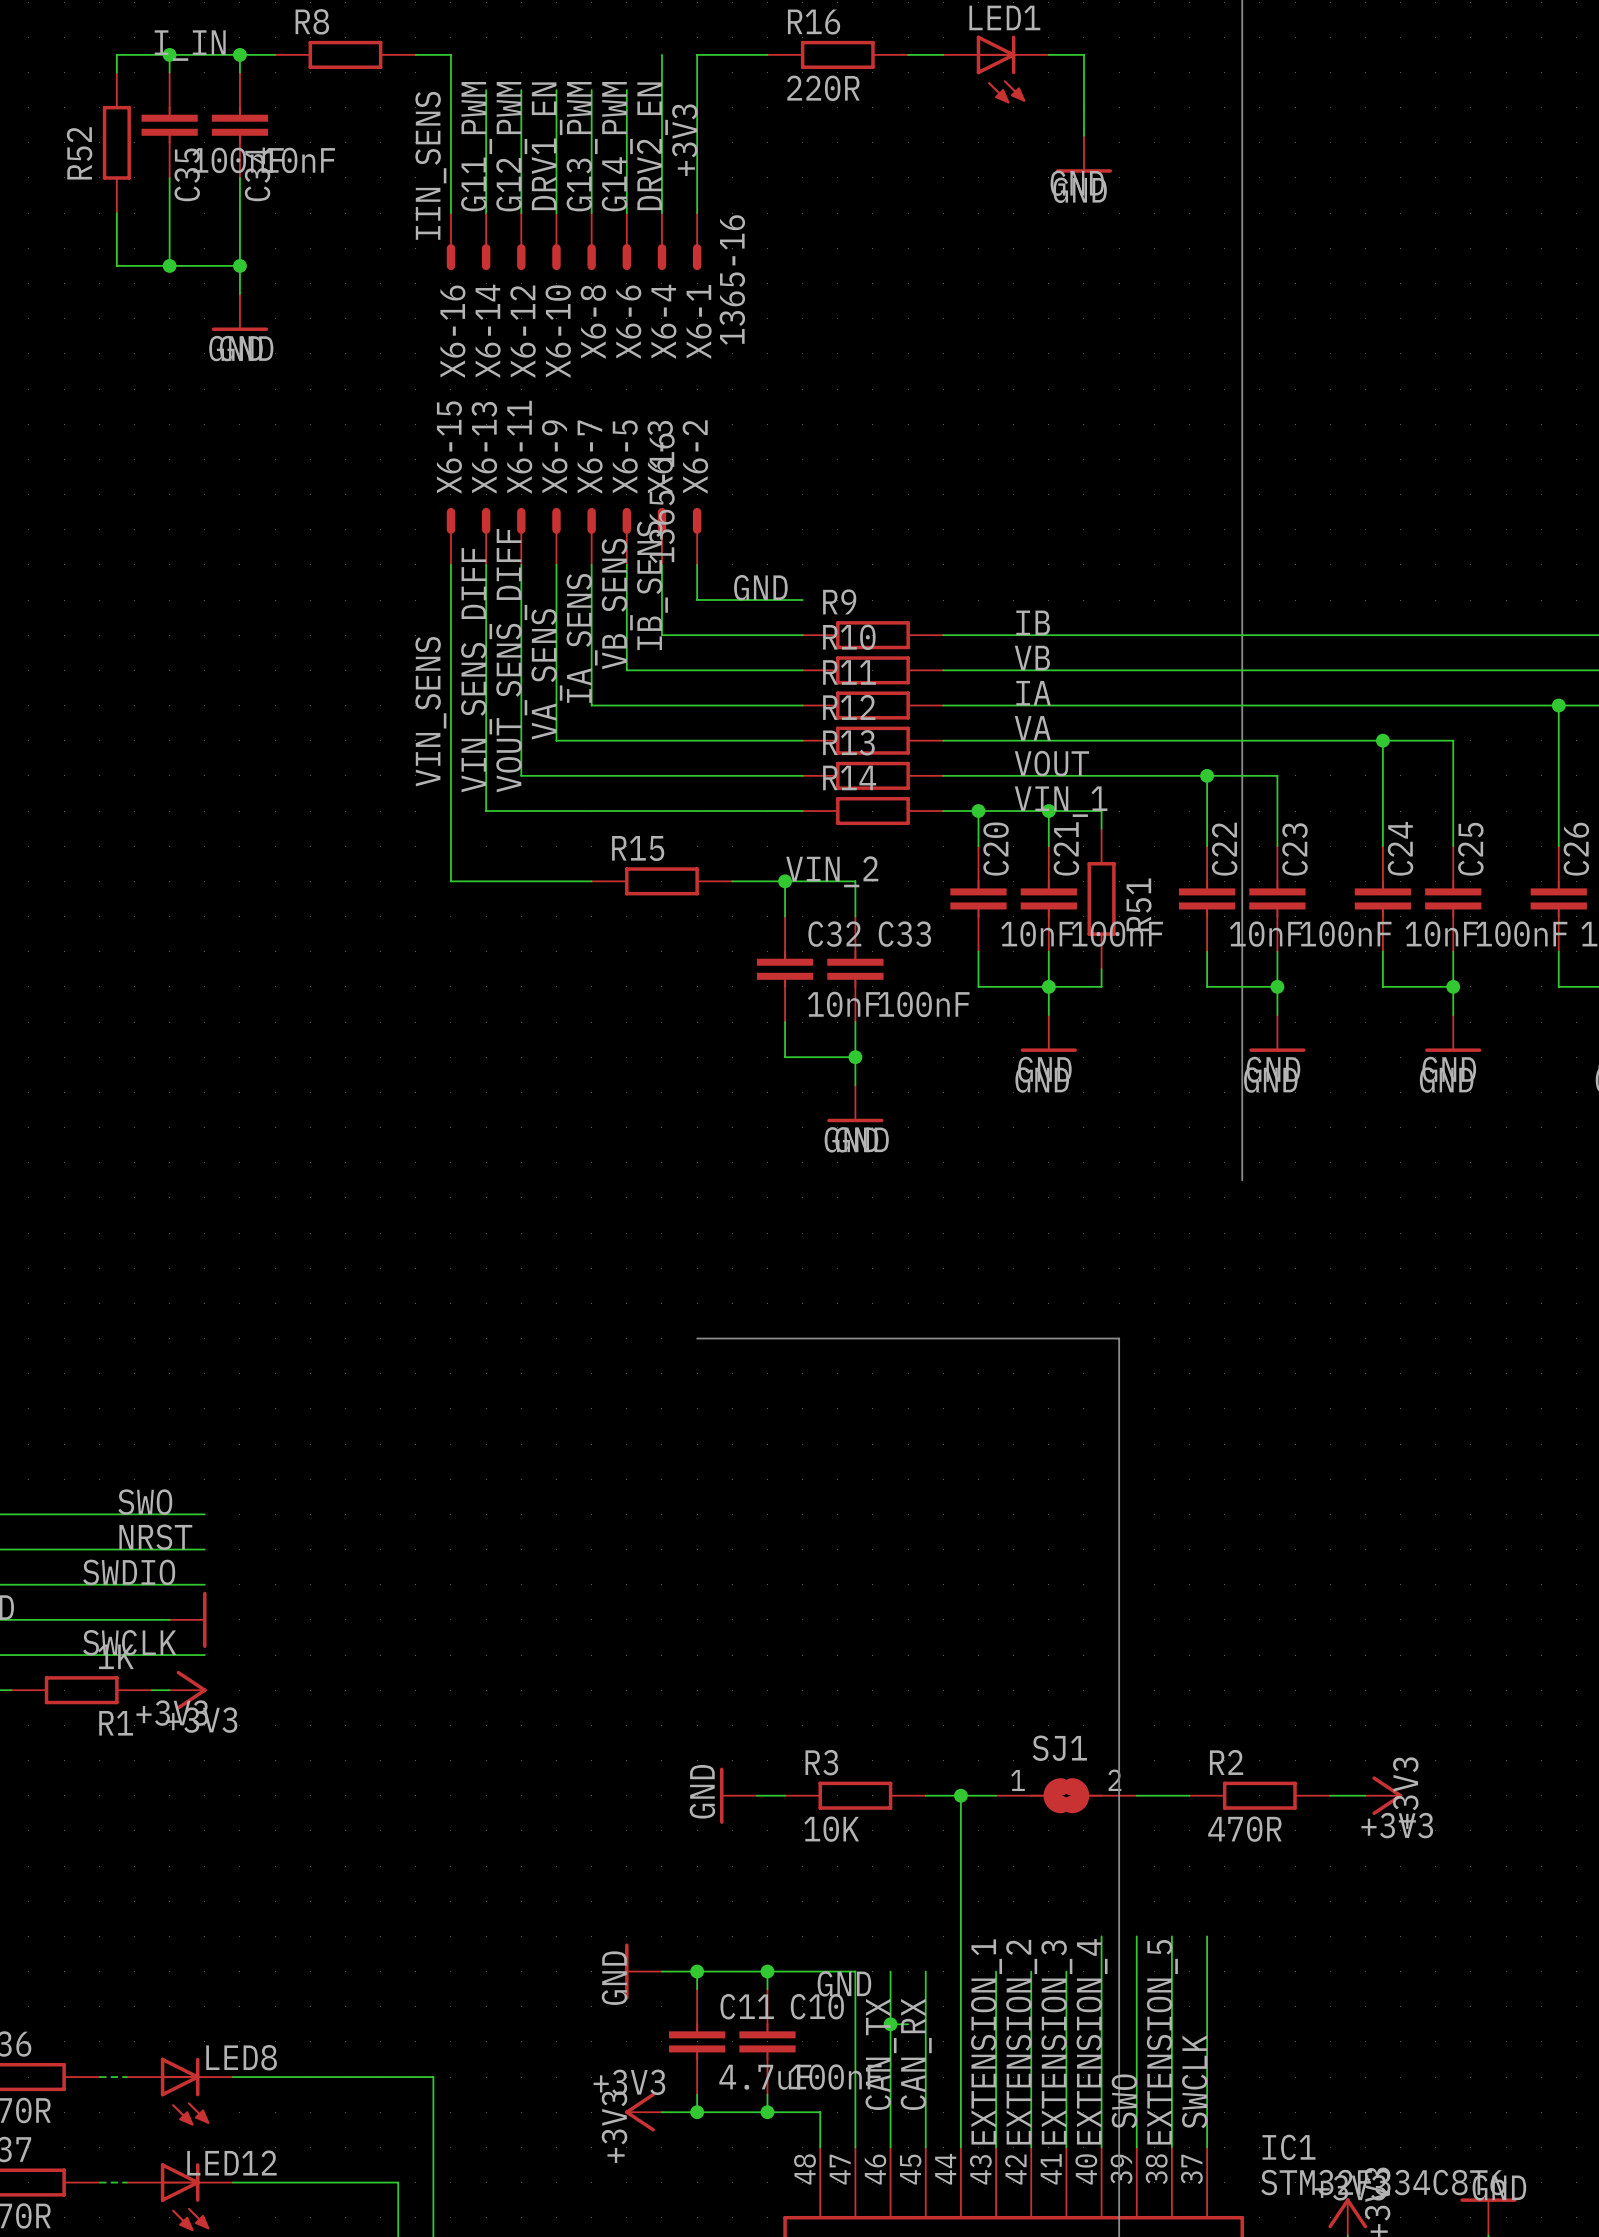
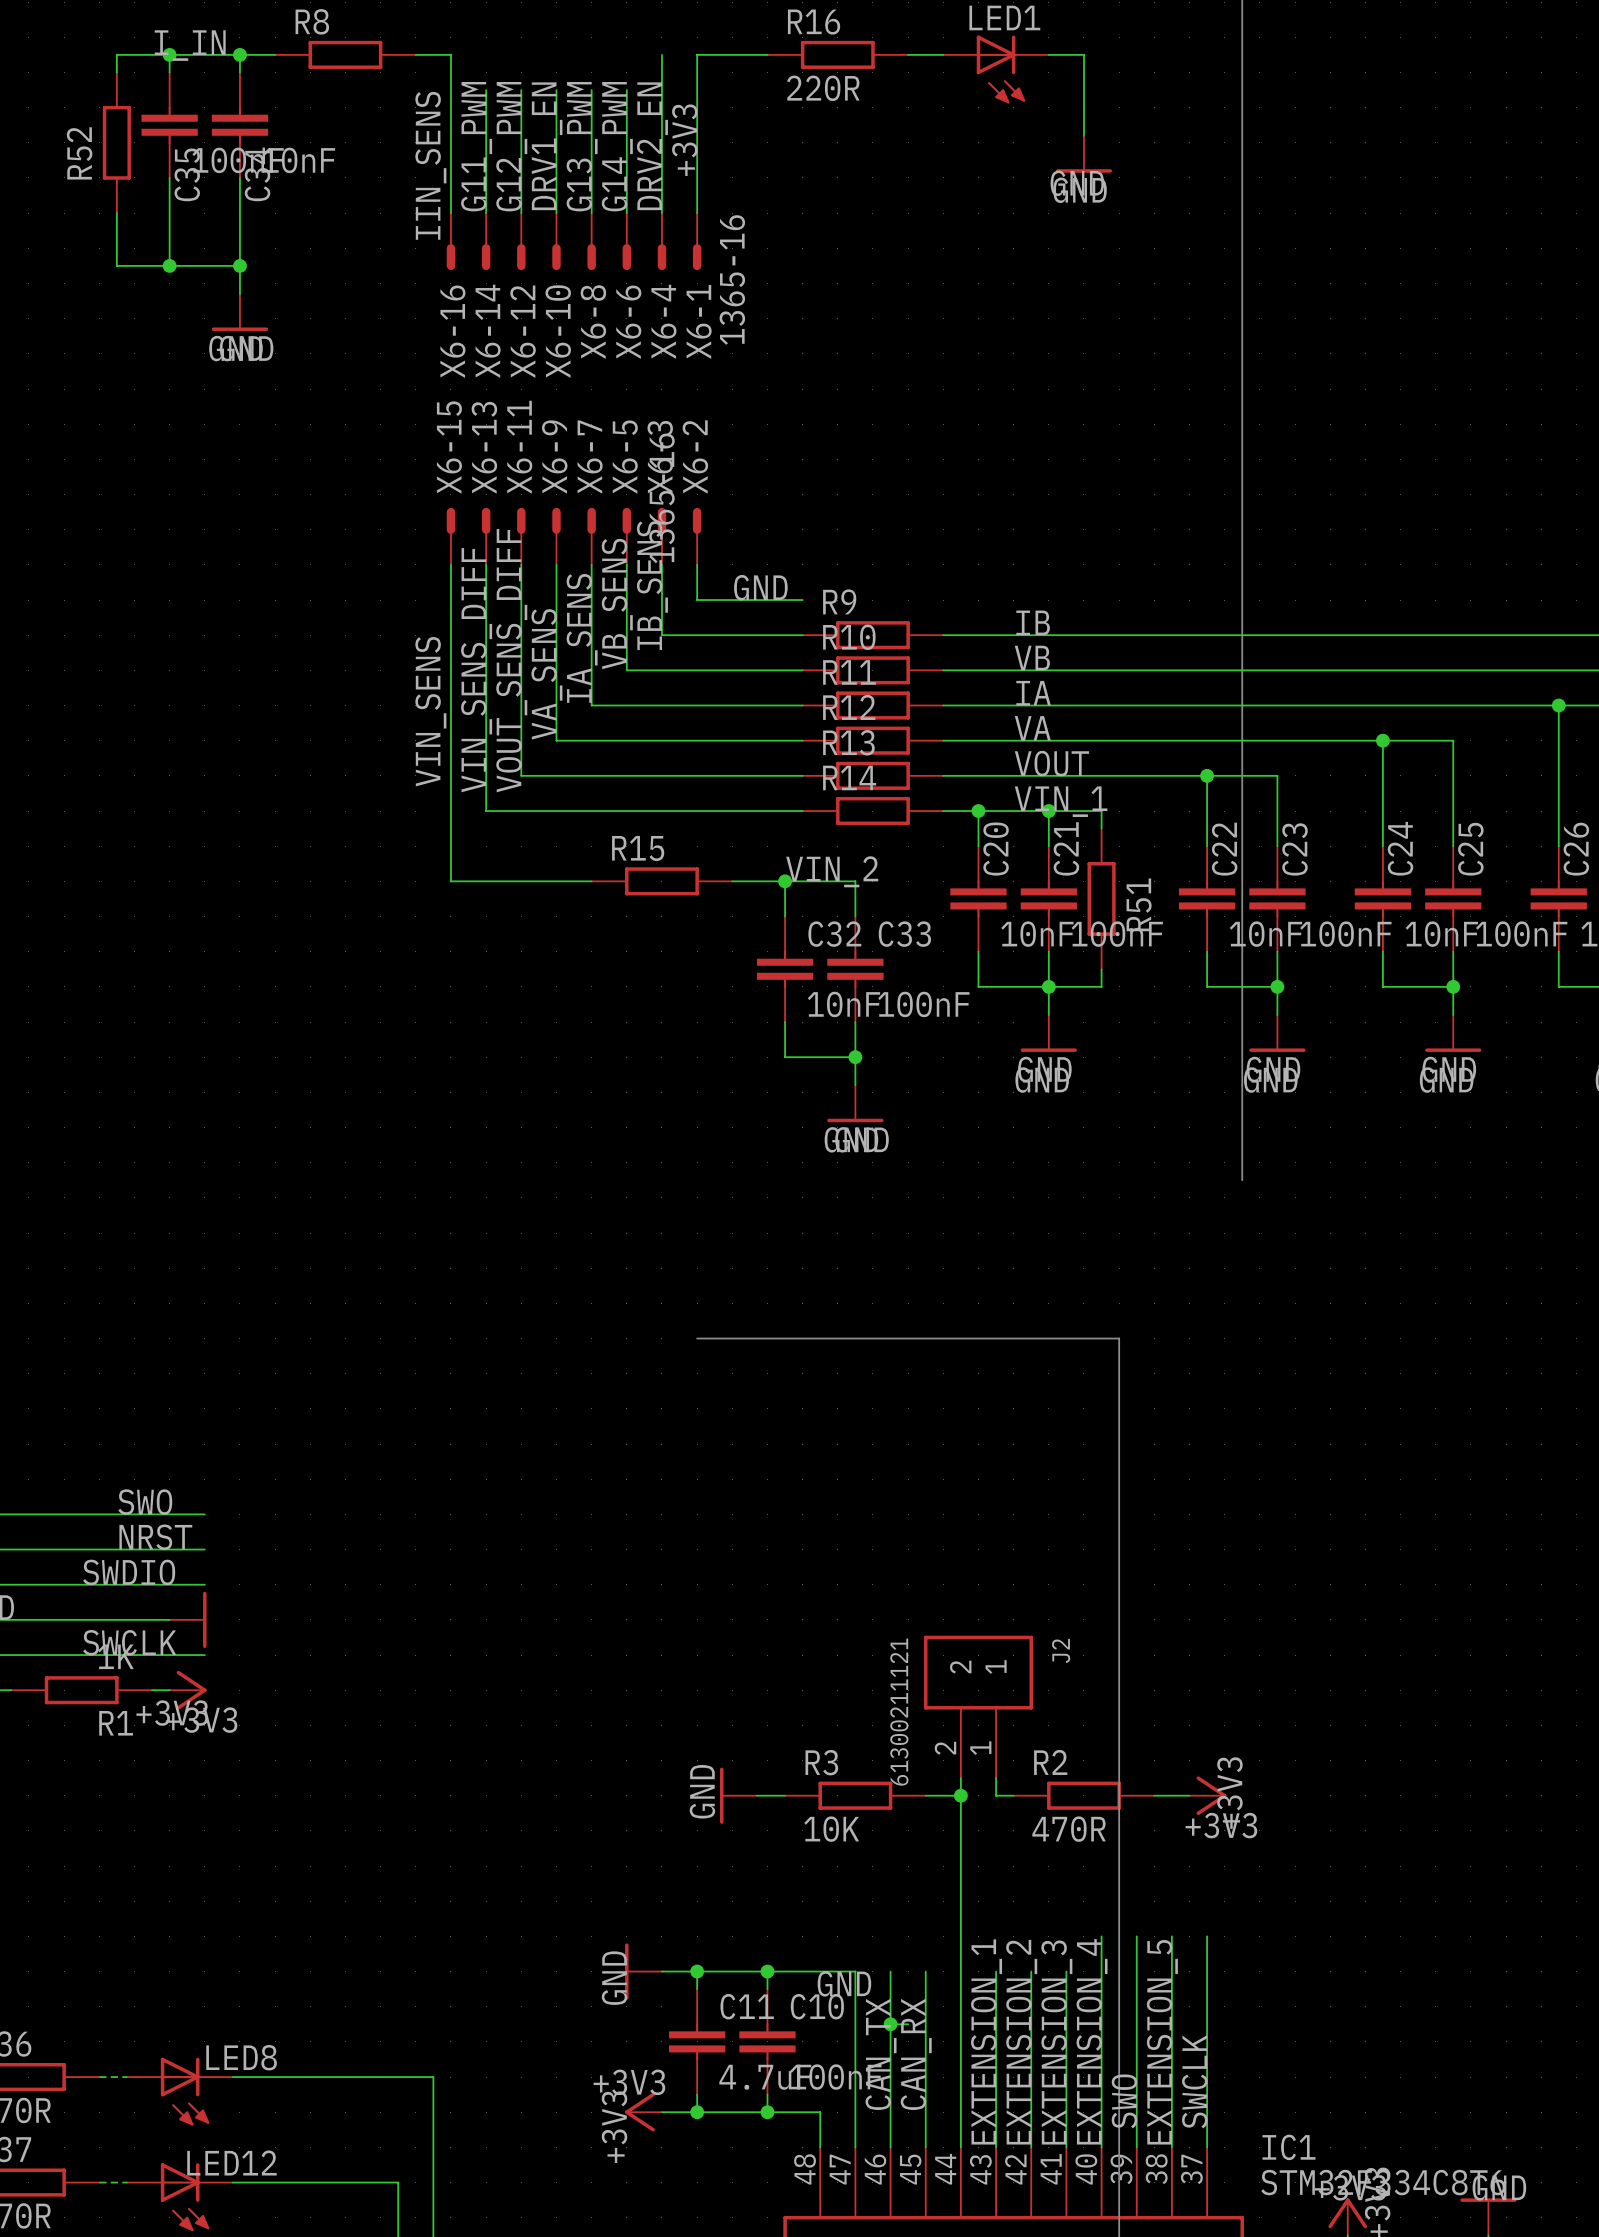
J2: none -> 61300211121 (978, 1706)
wire: none -> (996, 1778) (996, 1795) (1013, 1795)
label position: +3V3 (1405, 1793) -> +3V3 (1229, 1793)
wire: (960, 1795) (996, 1795) -> (960, 1795) (960, 1778)
SJ1: (1066, 1795) -> none
R2 position: (1259, 1795) -> (1083, 1795)
wire: (1330, 1795) (1365, 1795) -> none
power symbol position: +3V3 (1383, 1795) -> +3V3 (1207, 1795)

